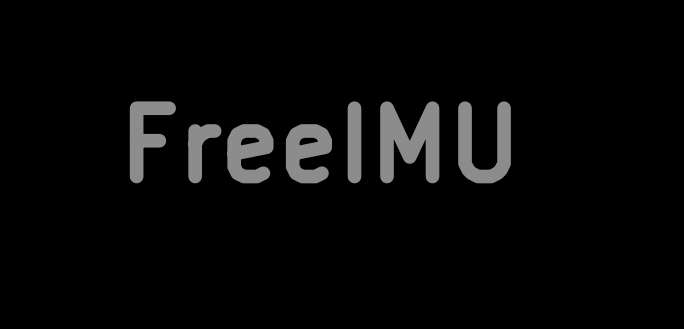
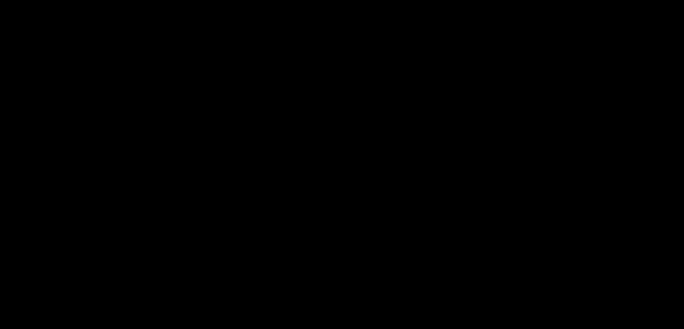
text: FreeIMU (320, 142) -> none

